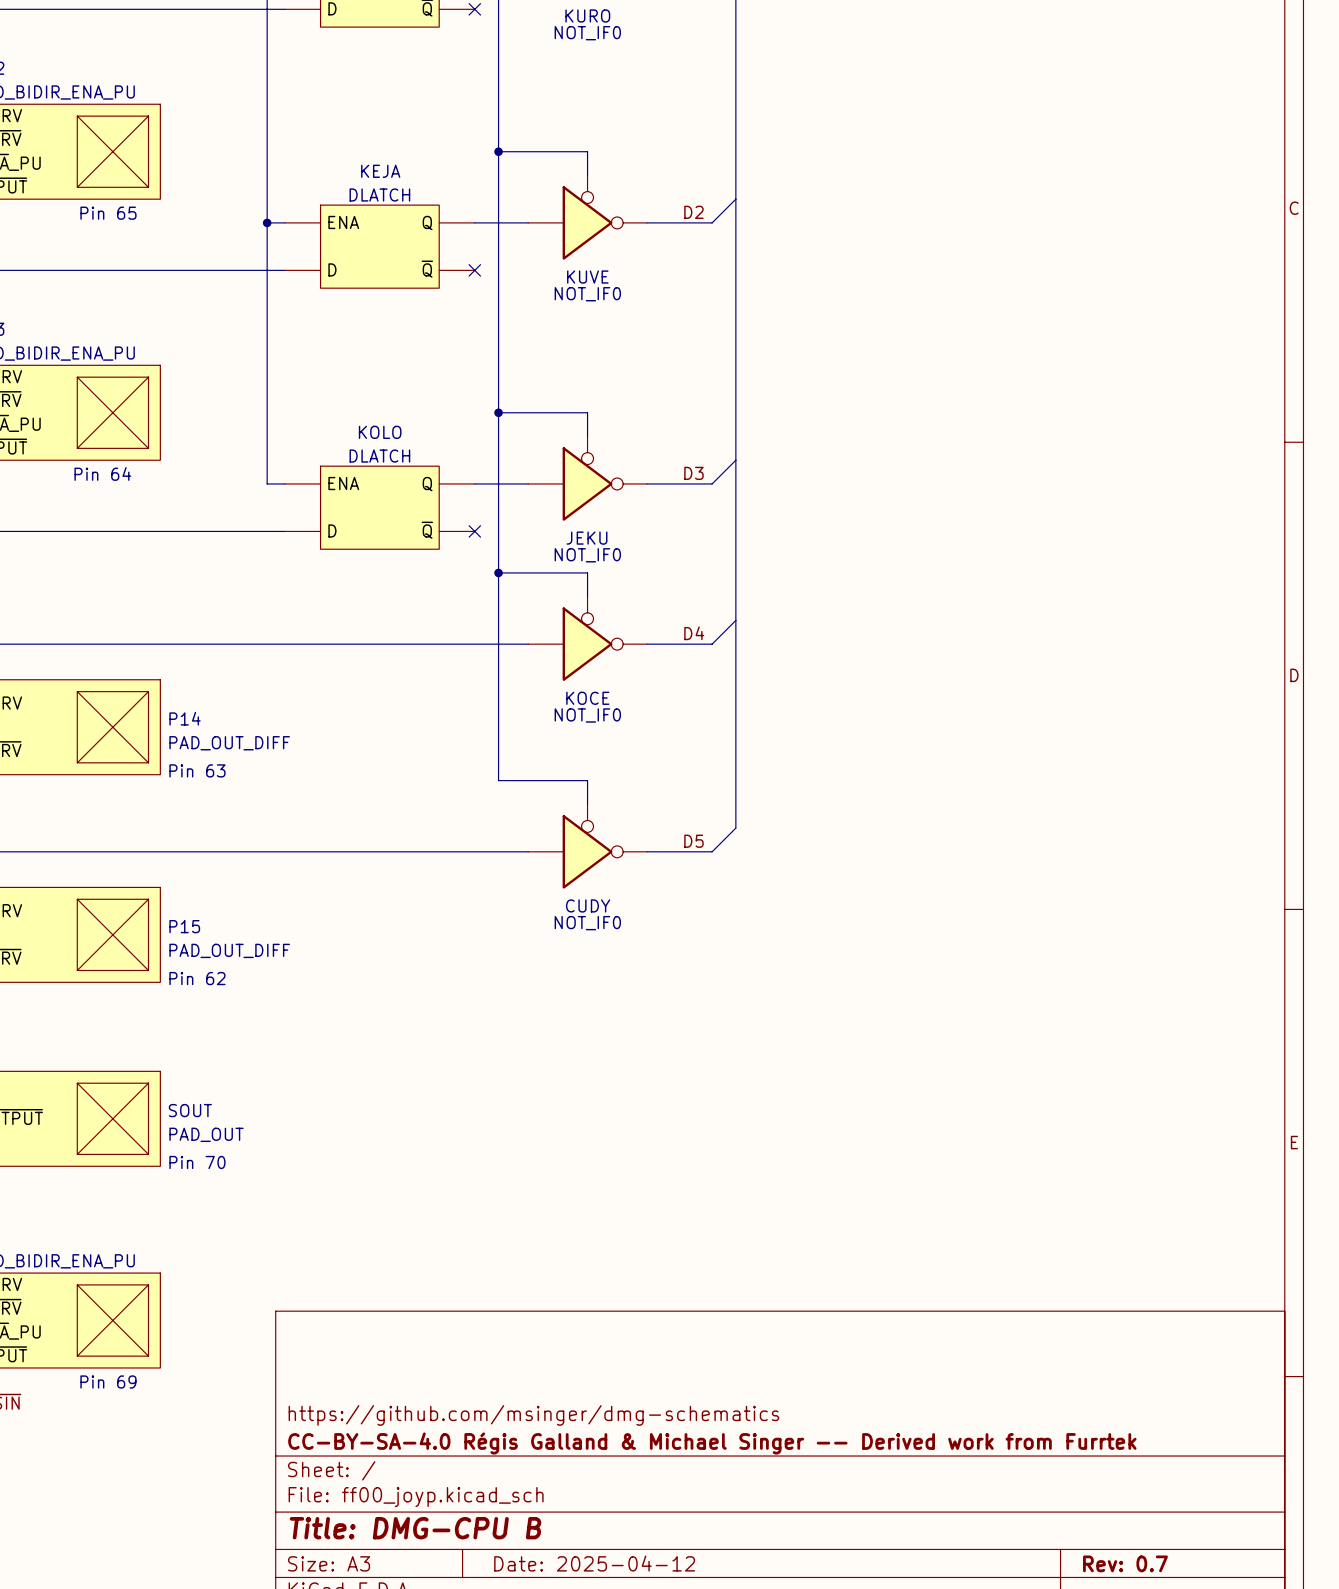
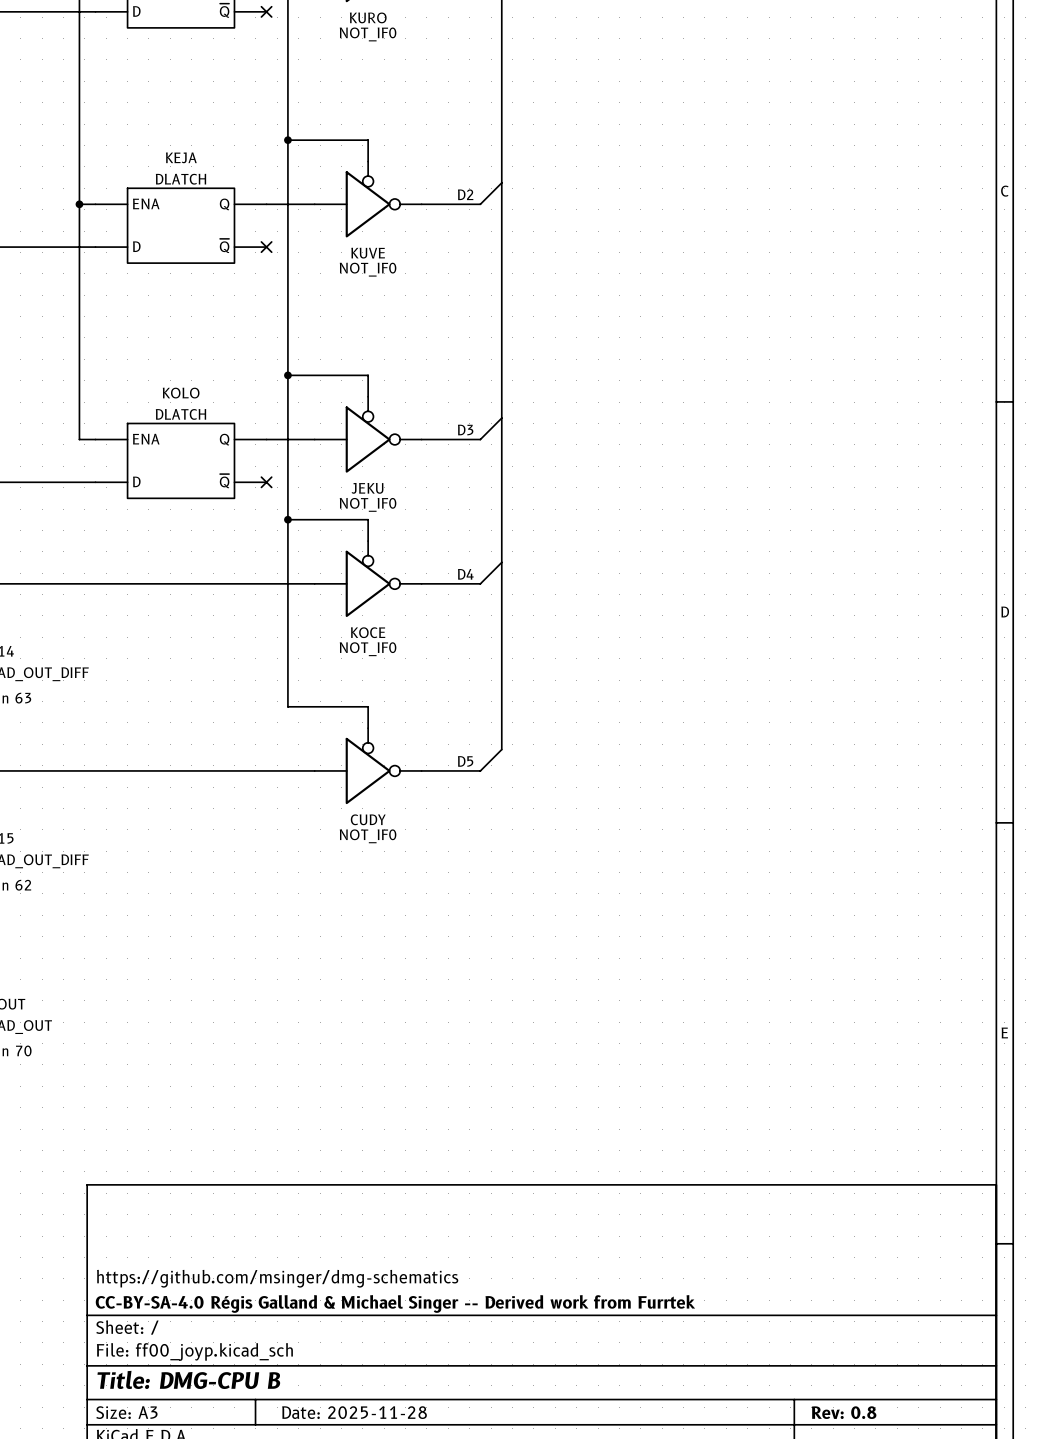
title block: Date: 2025-04-12 (594, 1563) -> Date: 2025-11-28 (354, 1412)
title block: Rev: 0.7 (1125, 1563) -> Rev: 0.8 (844, 1412)

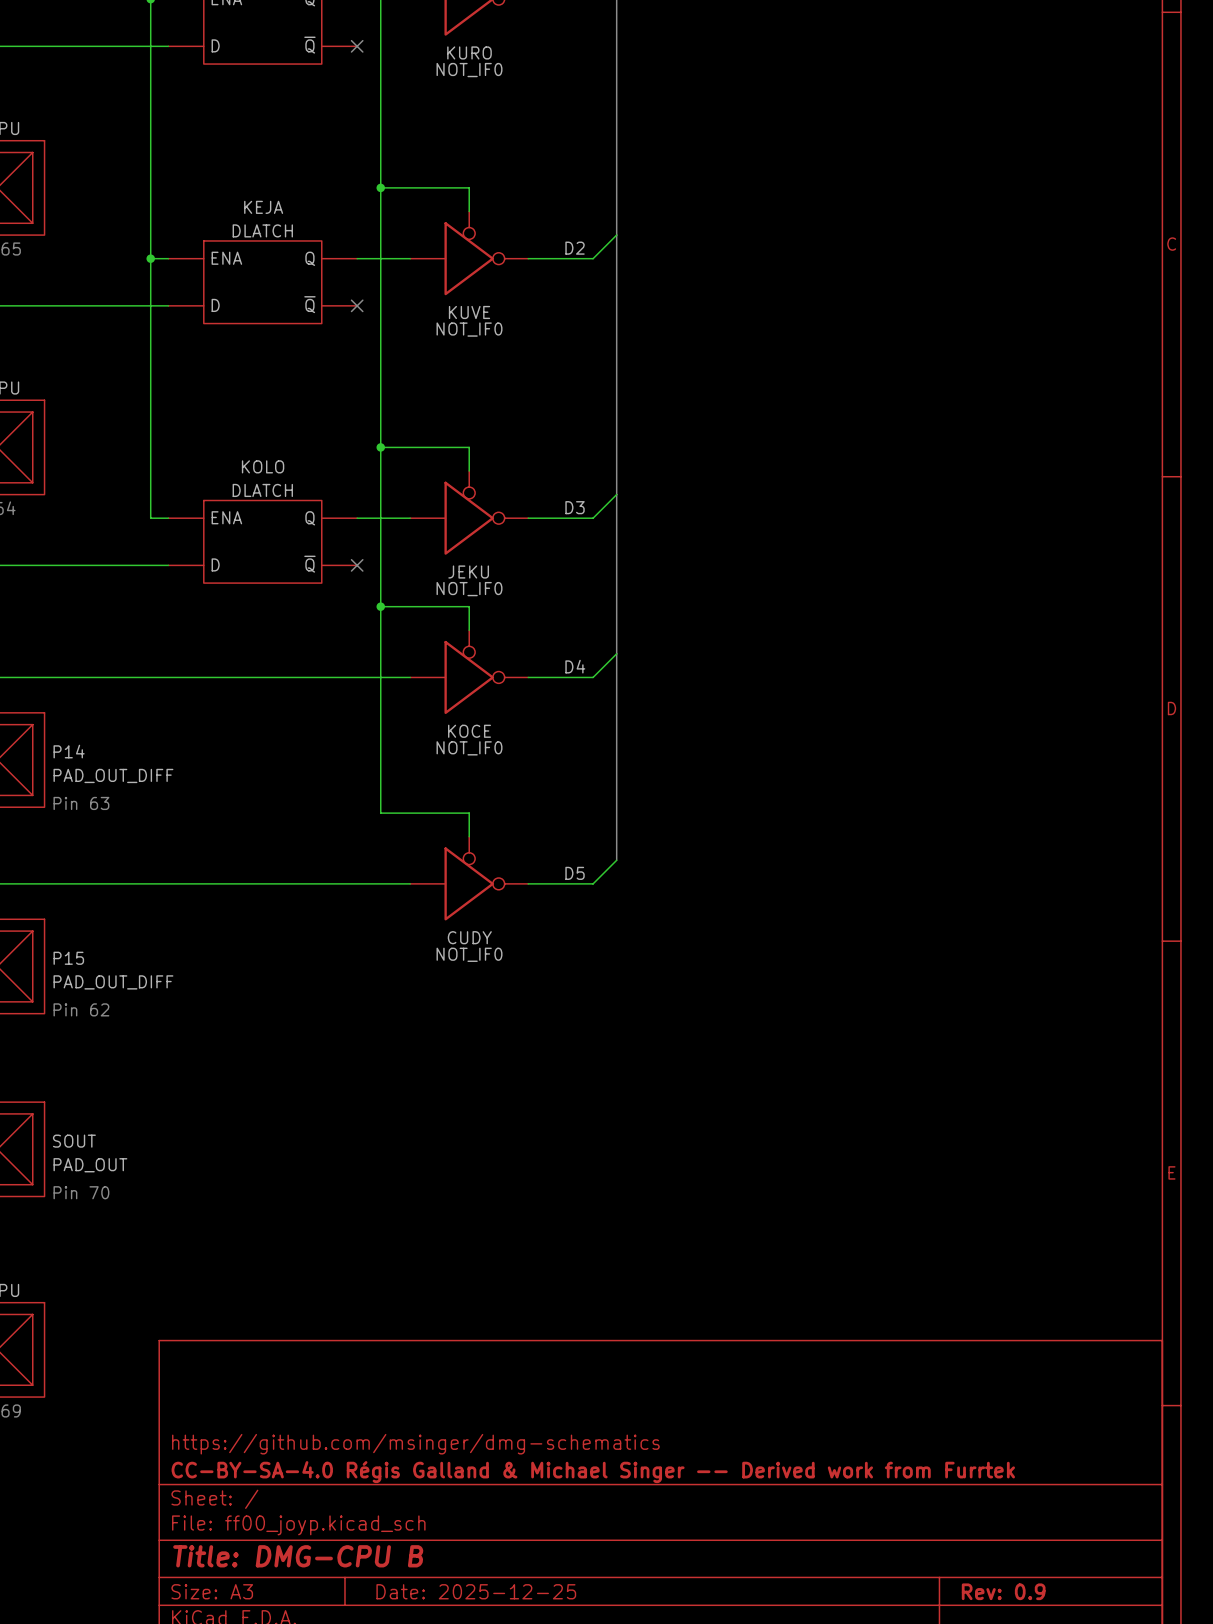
title block: Date: 2025-11-28 (354, 1412) -> Date: 2025-12-25 (476, 1591)
title block: Rev: 0.8 (844, 1412) -> Rev: 0.9 (1003, 1591)

